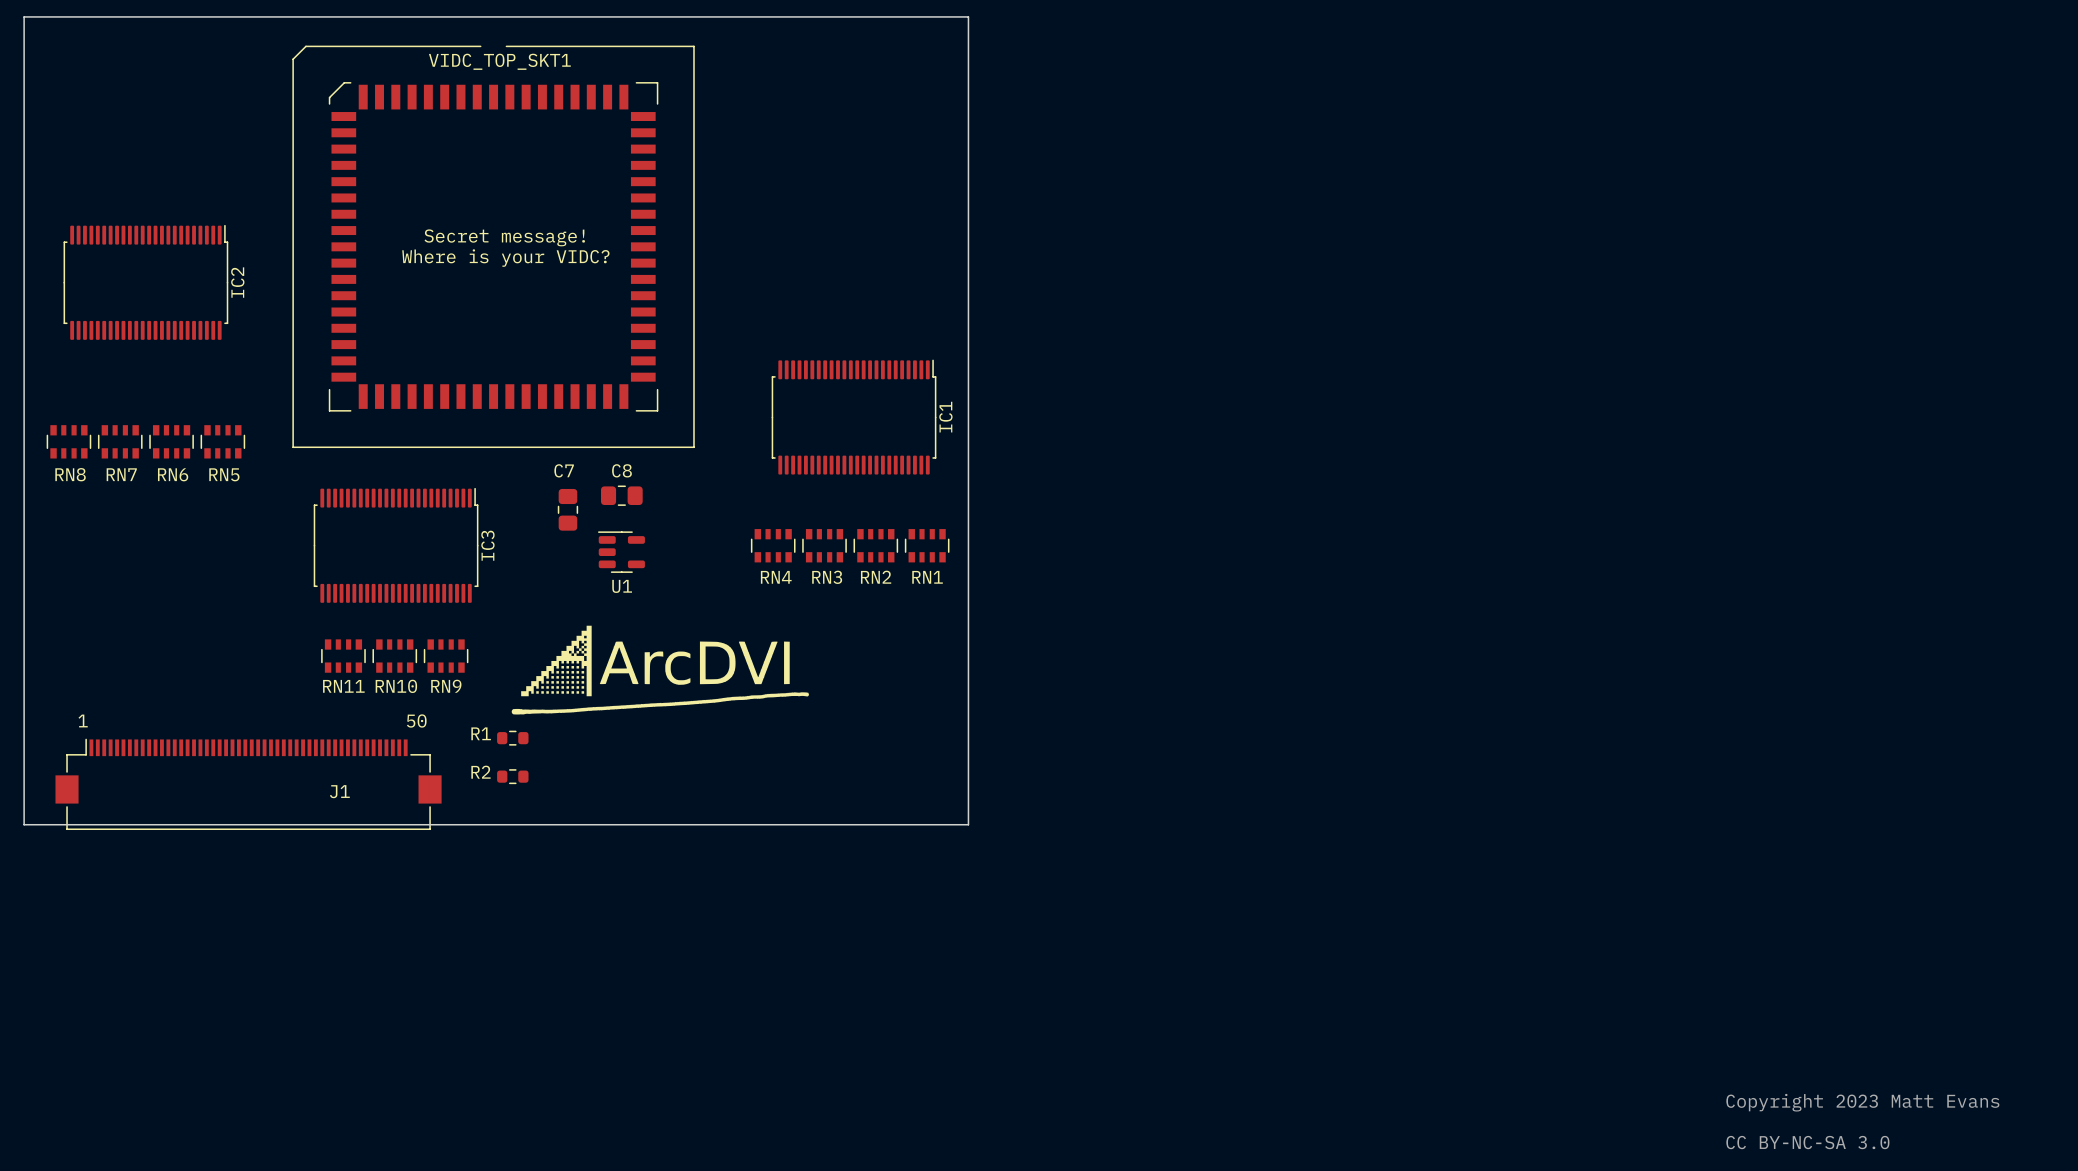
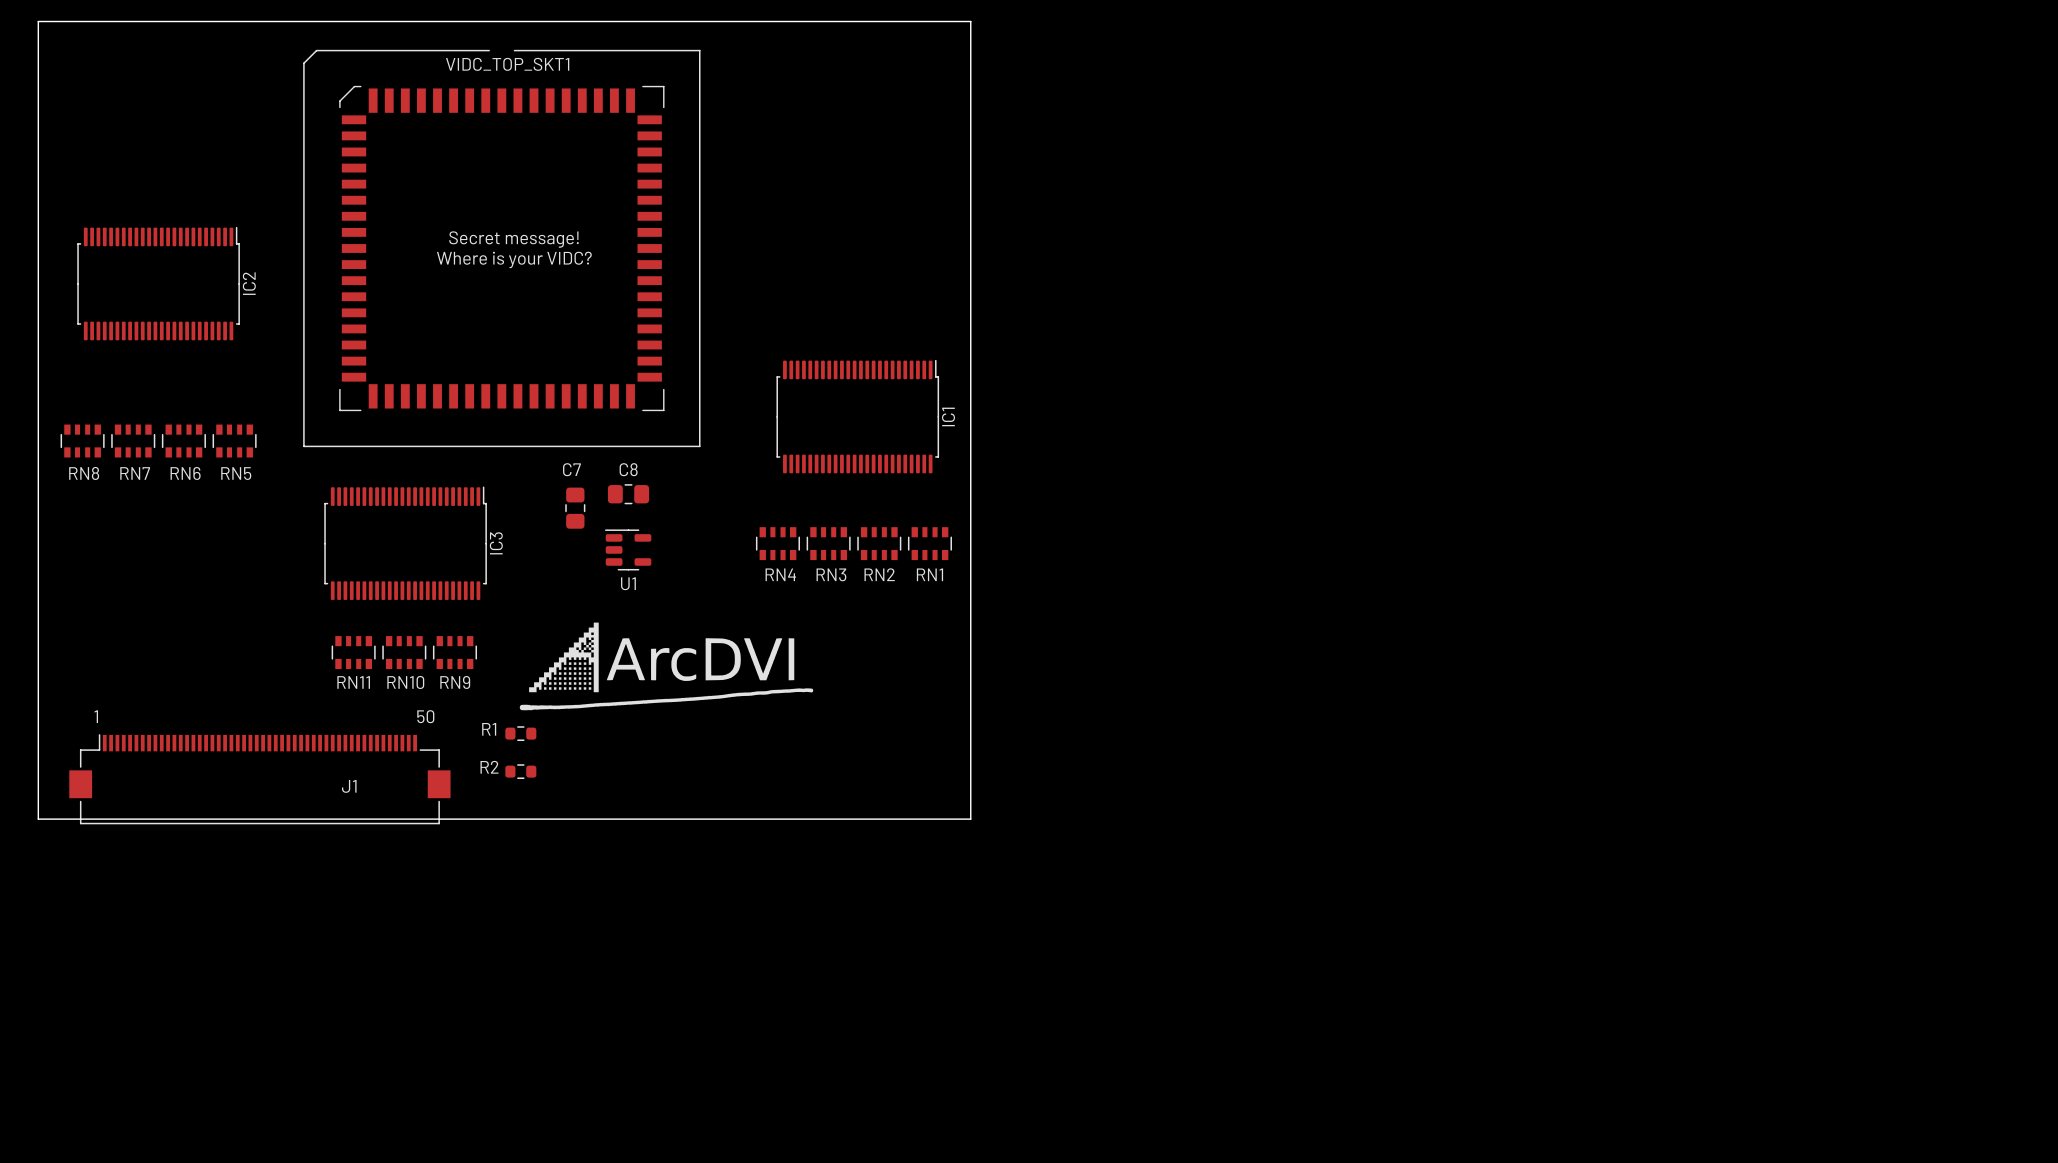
text: Copyright 2023 Matt Evans (1862, 1102) -> none
text: CC BY-NC-SA 3.0 (1807, 1142) -> none

